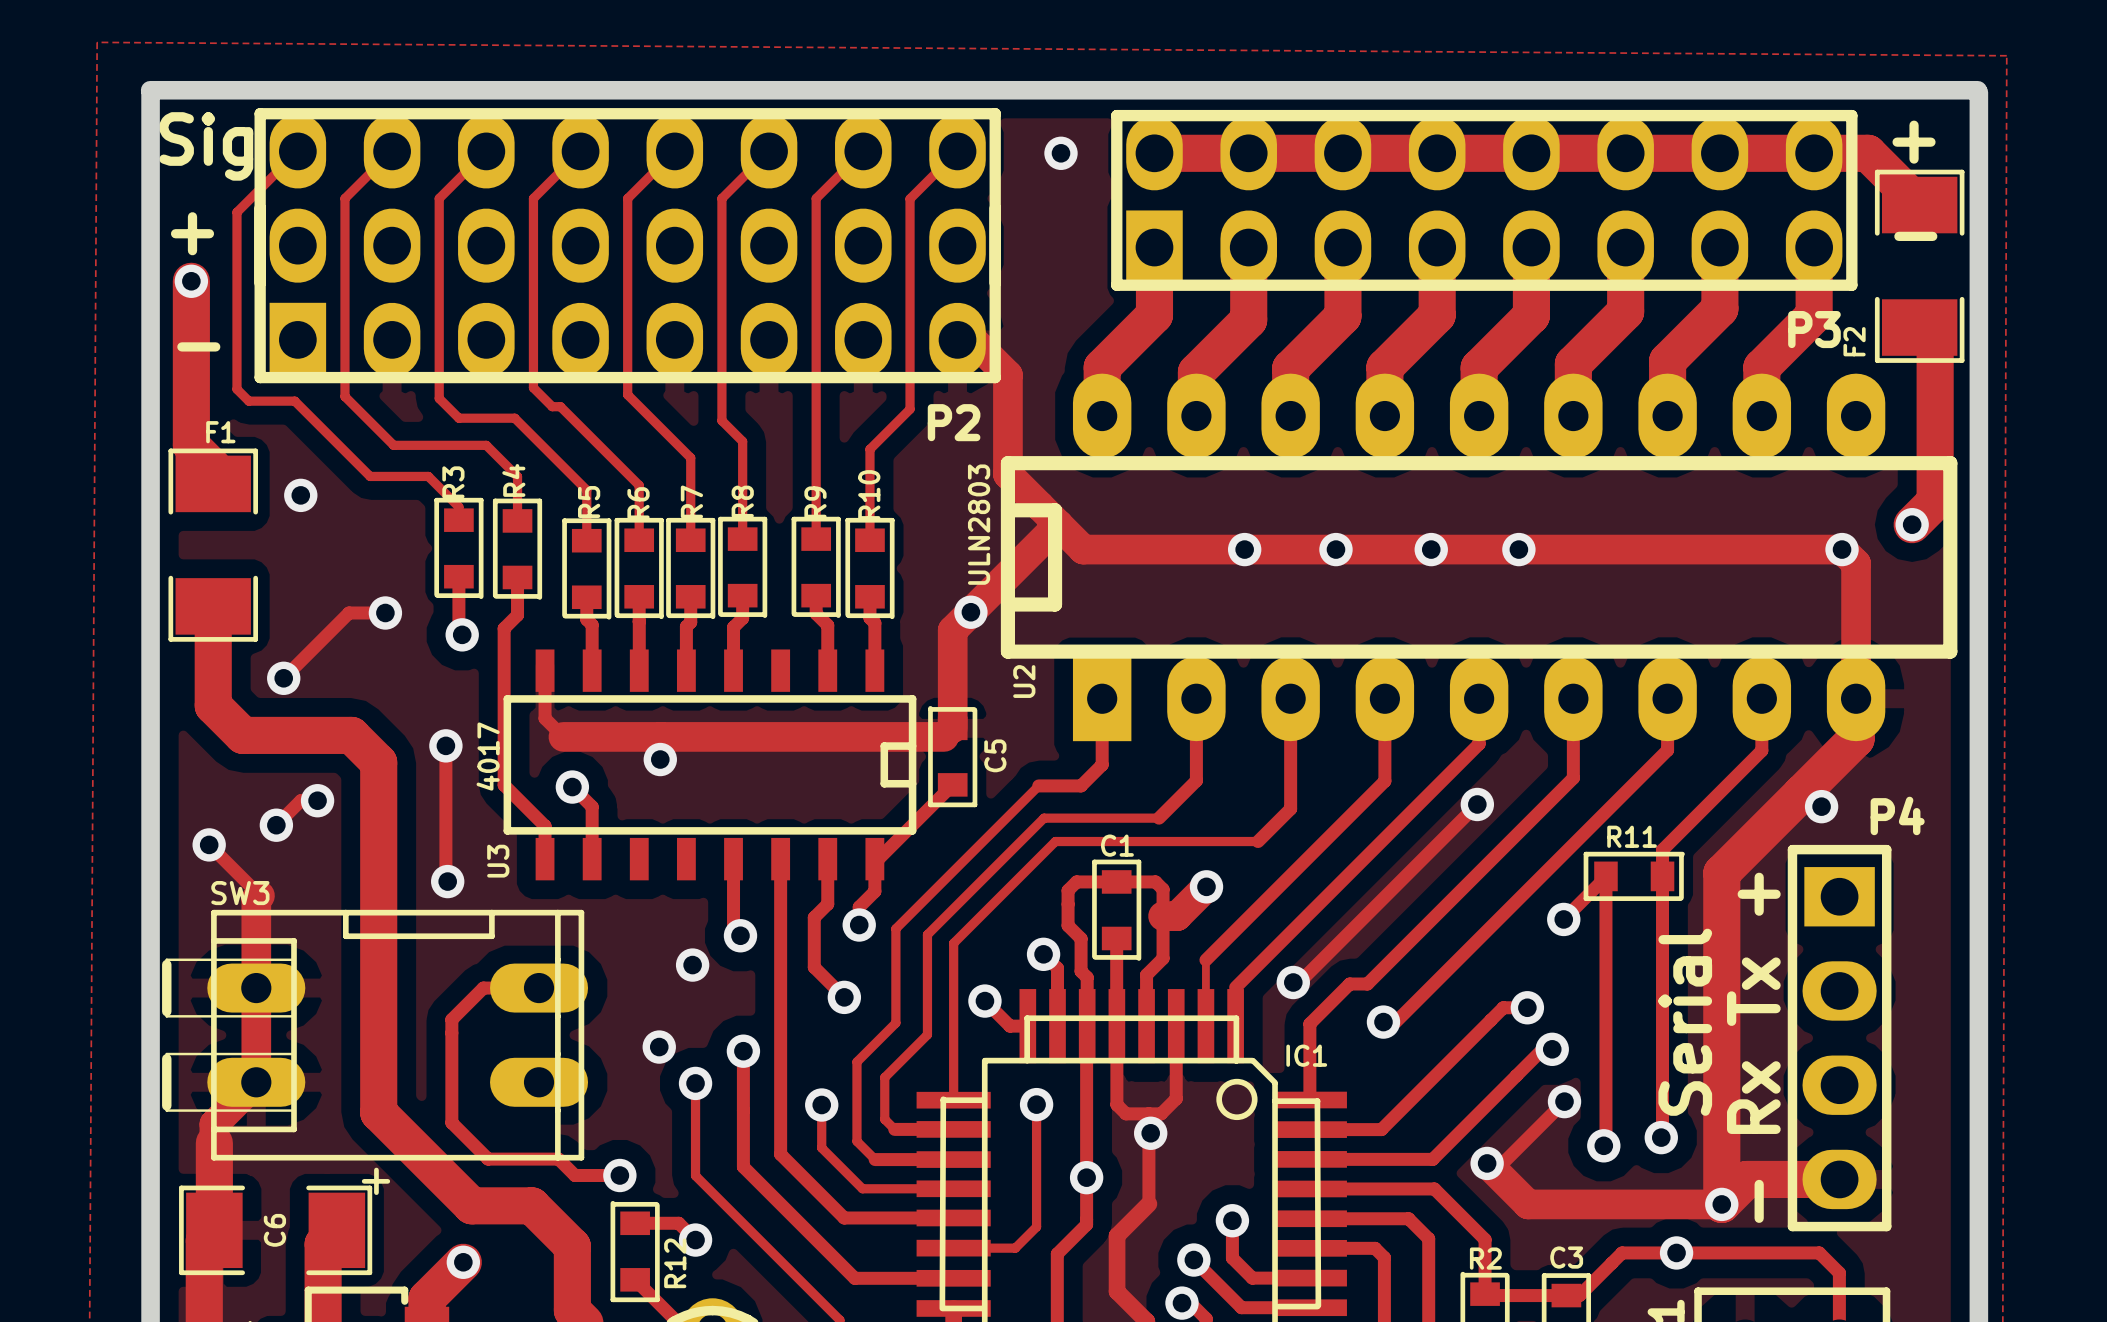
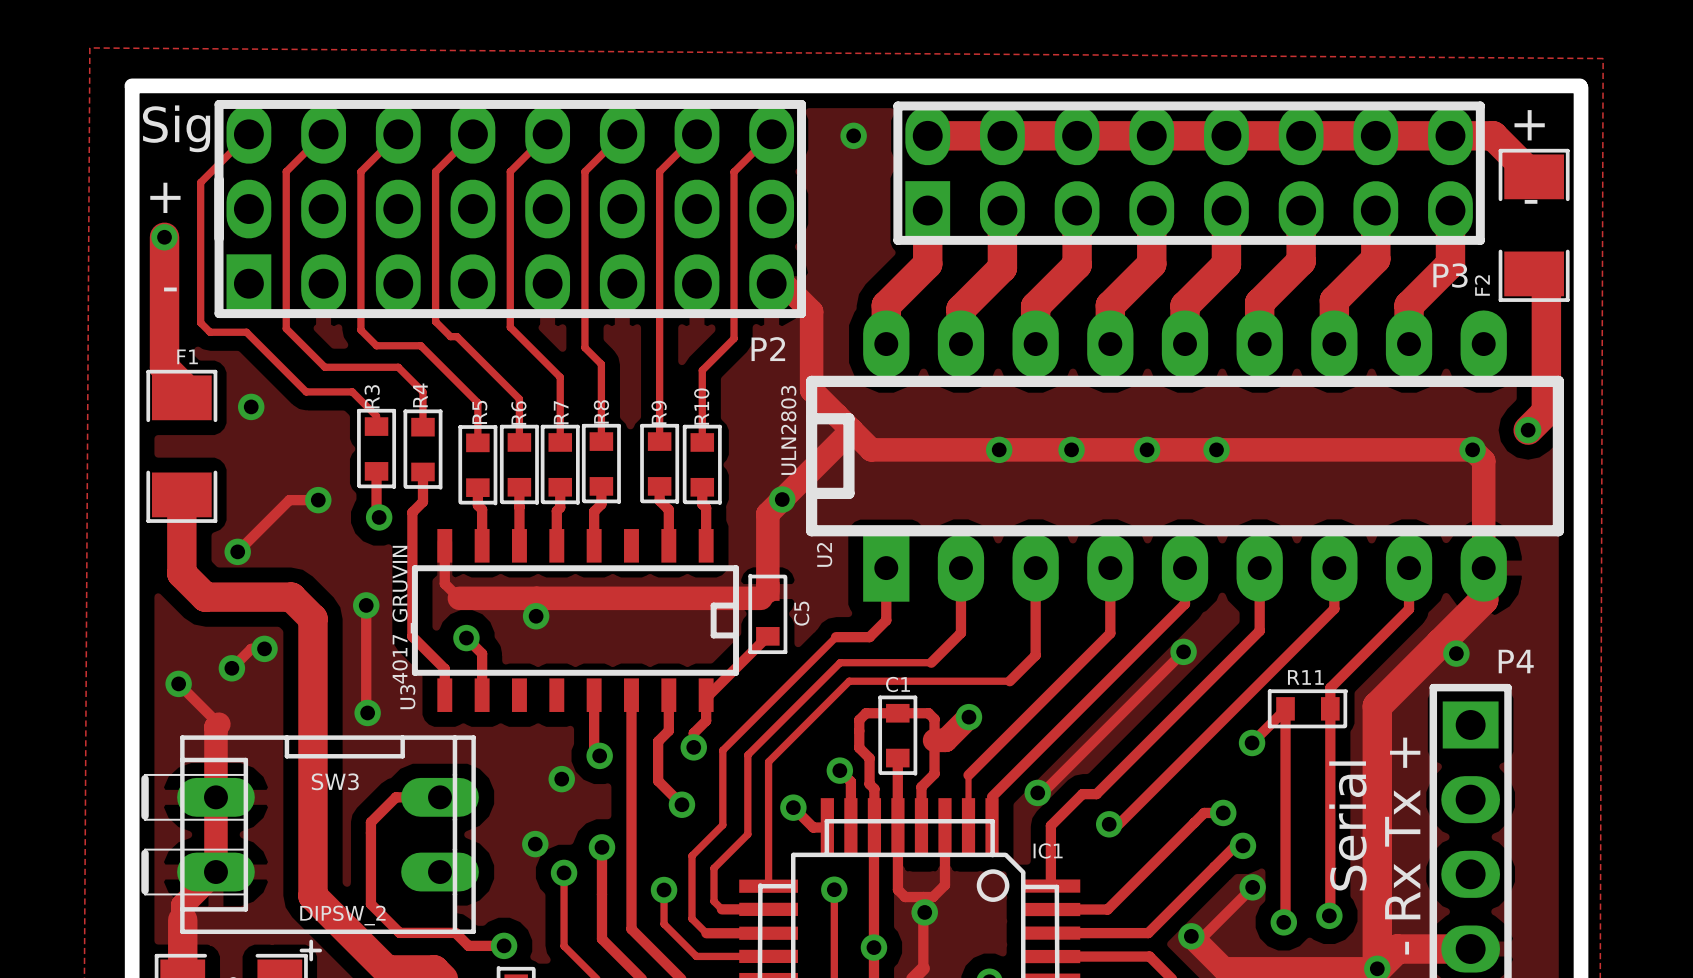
U3 value: 4017 (488, 756) -> 4017_GRUVIN (402, 614)
SW3 name position: SW3 (240, 893) -> SW3 (335, 781)
SW3 value: none -> DIPSW_2 (342, 915)

